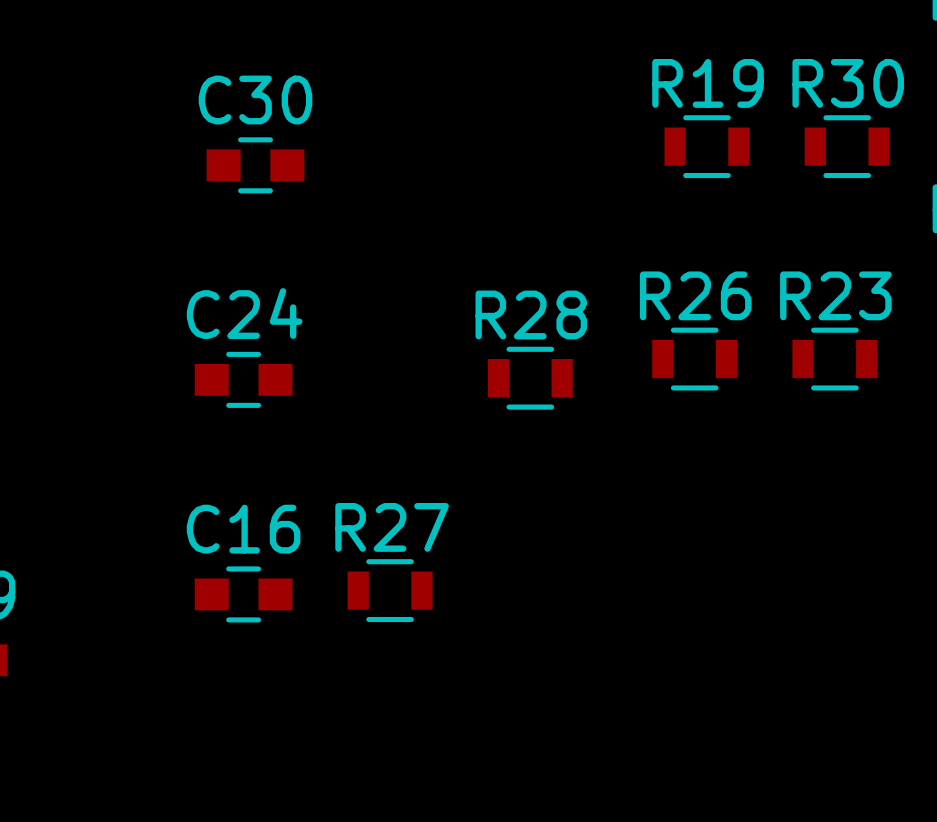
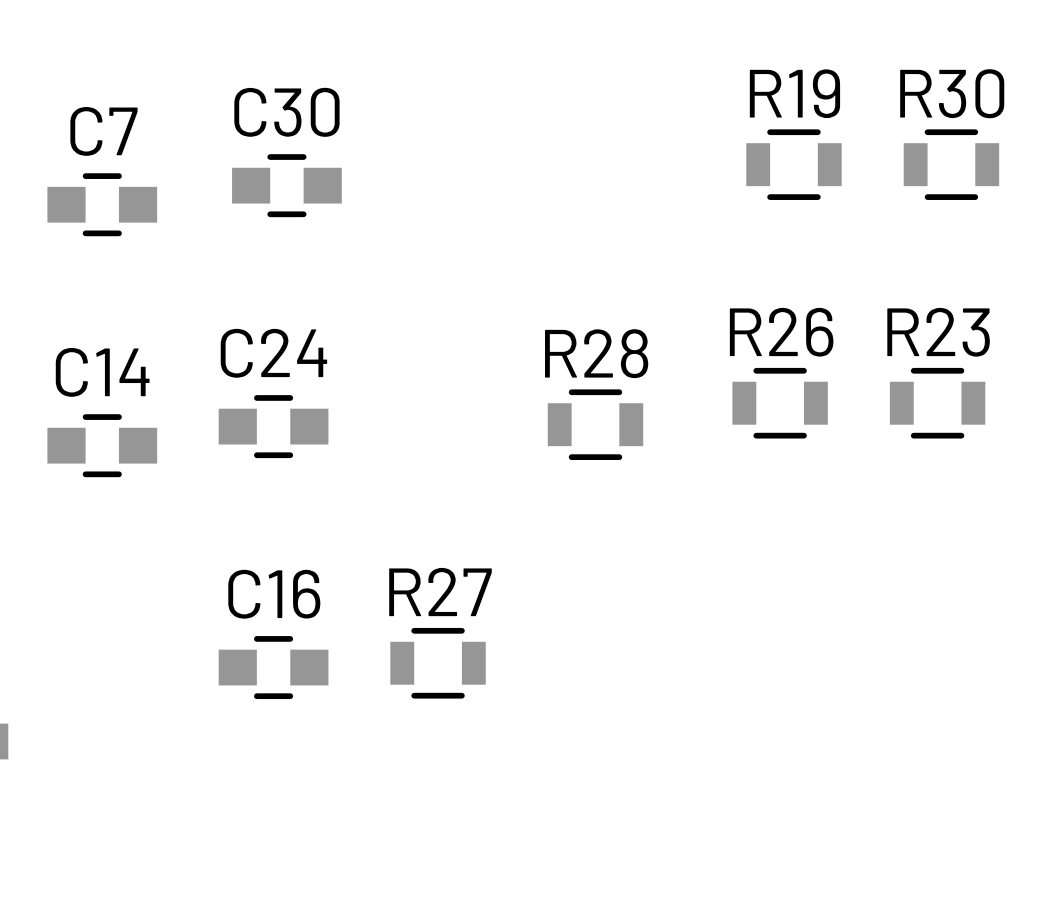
C7: none -> (102, 204)
C14: none -> (102, 445)

